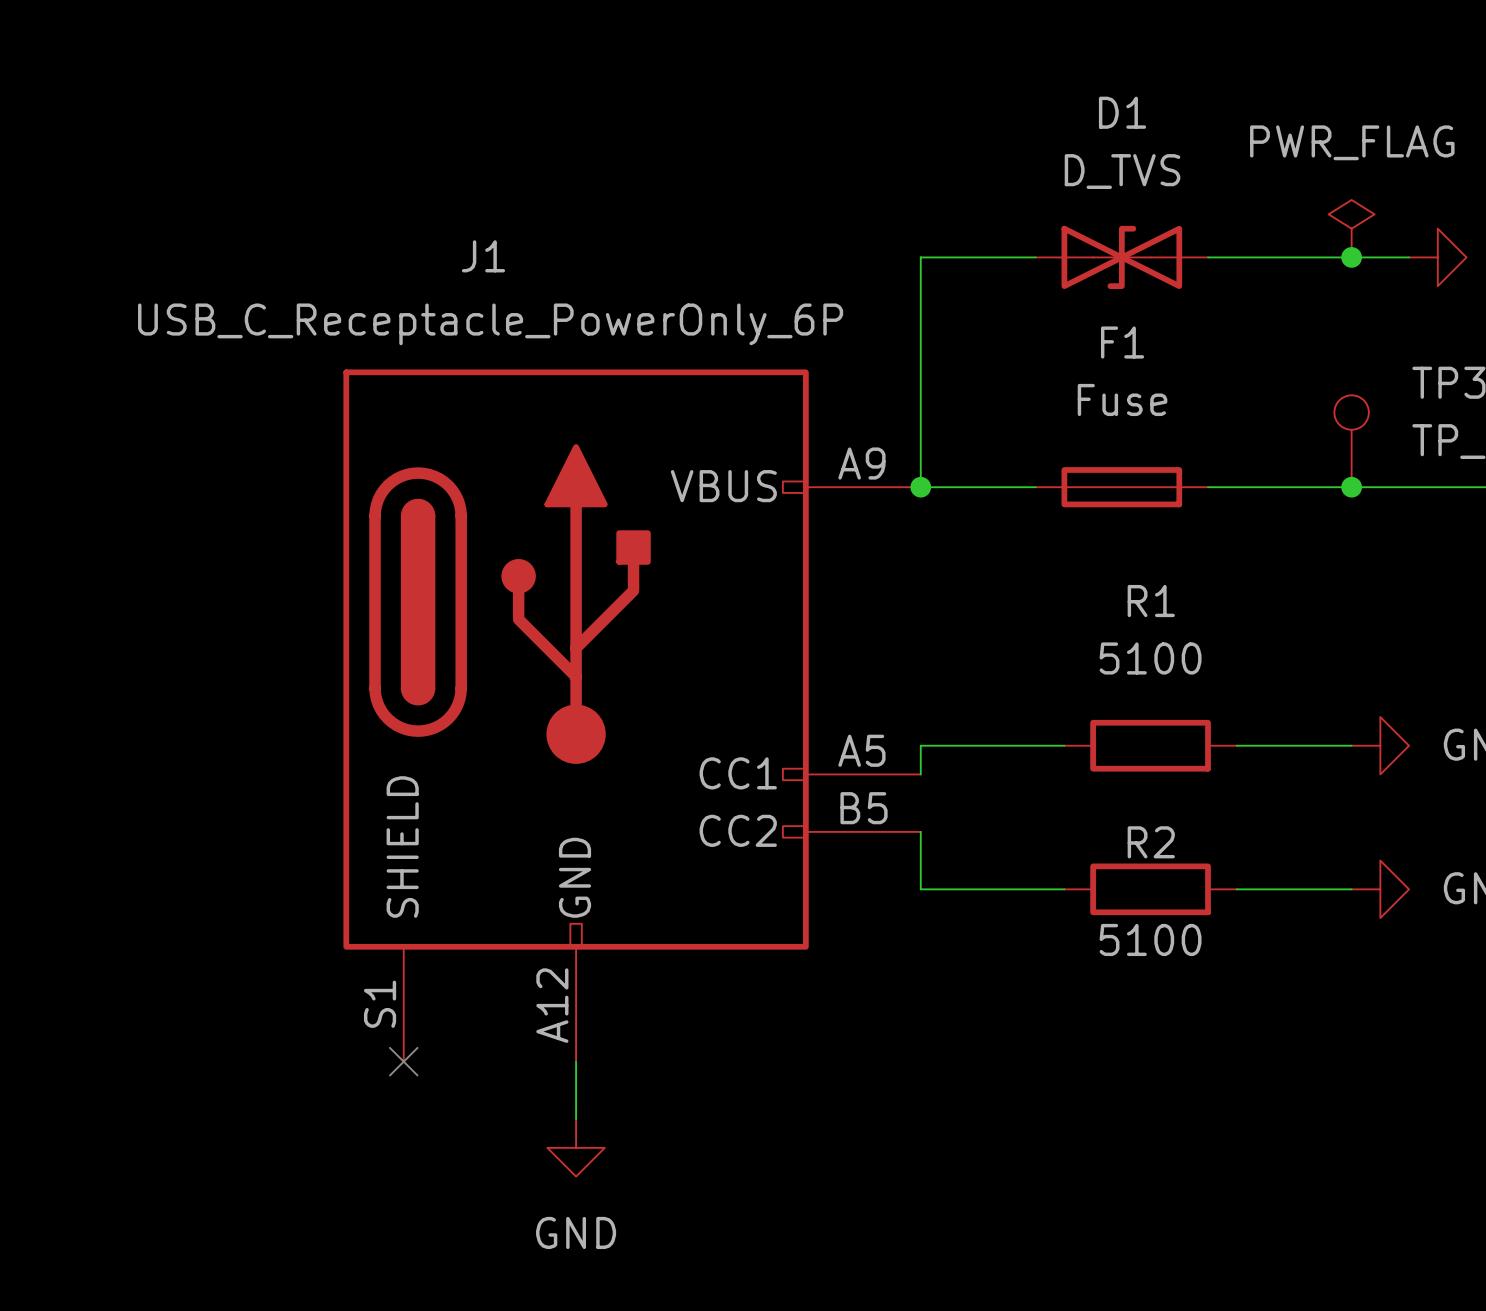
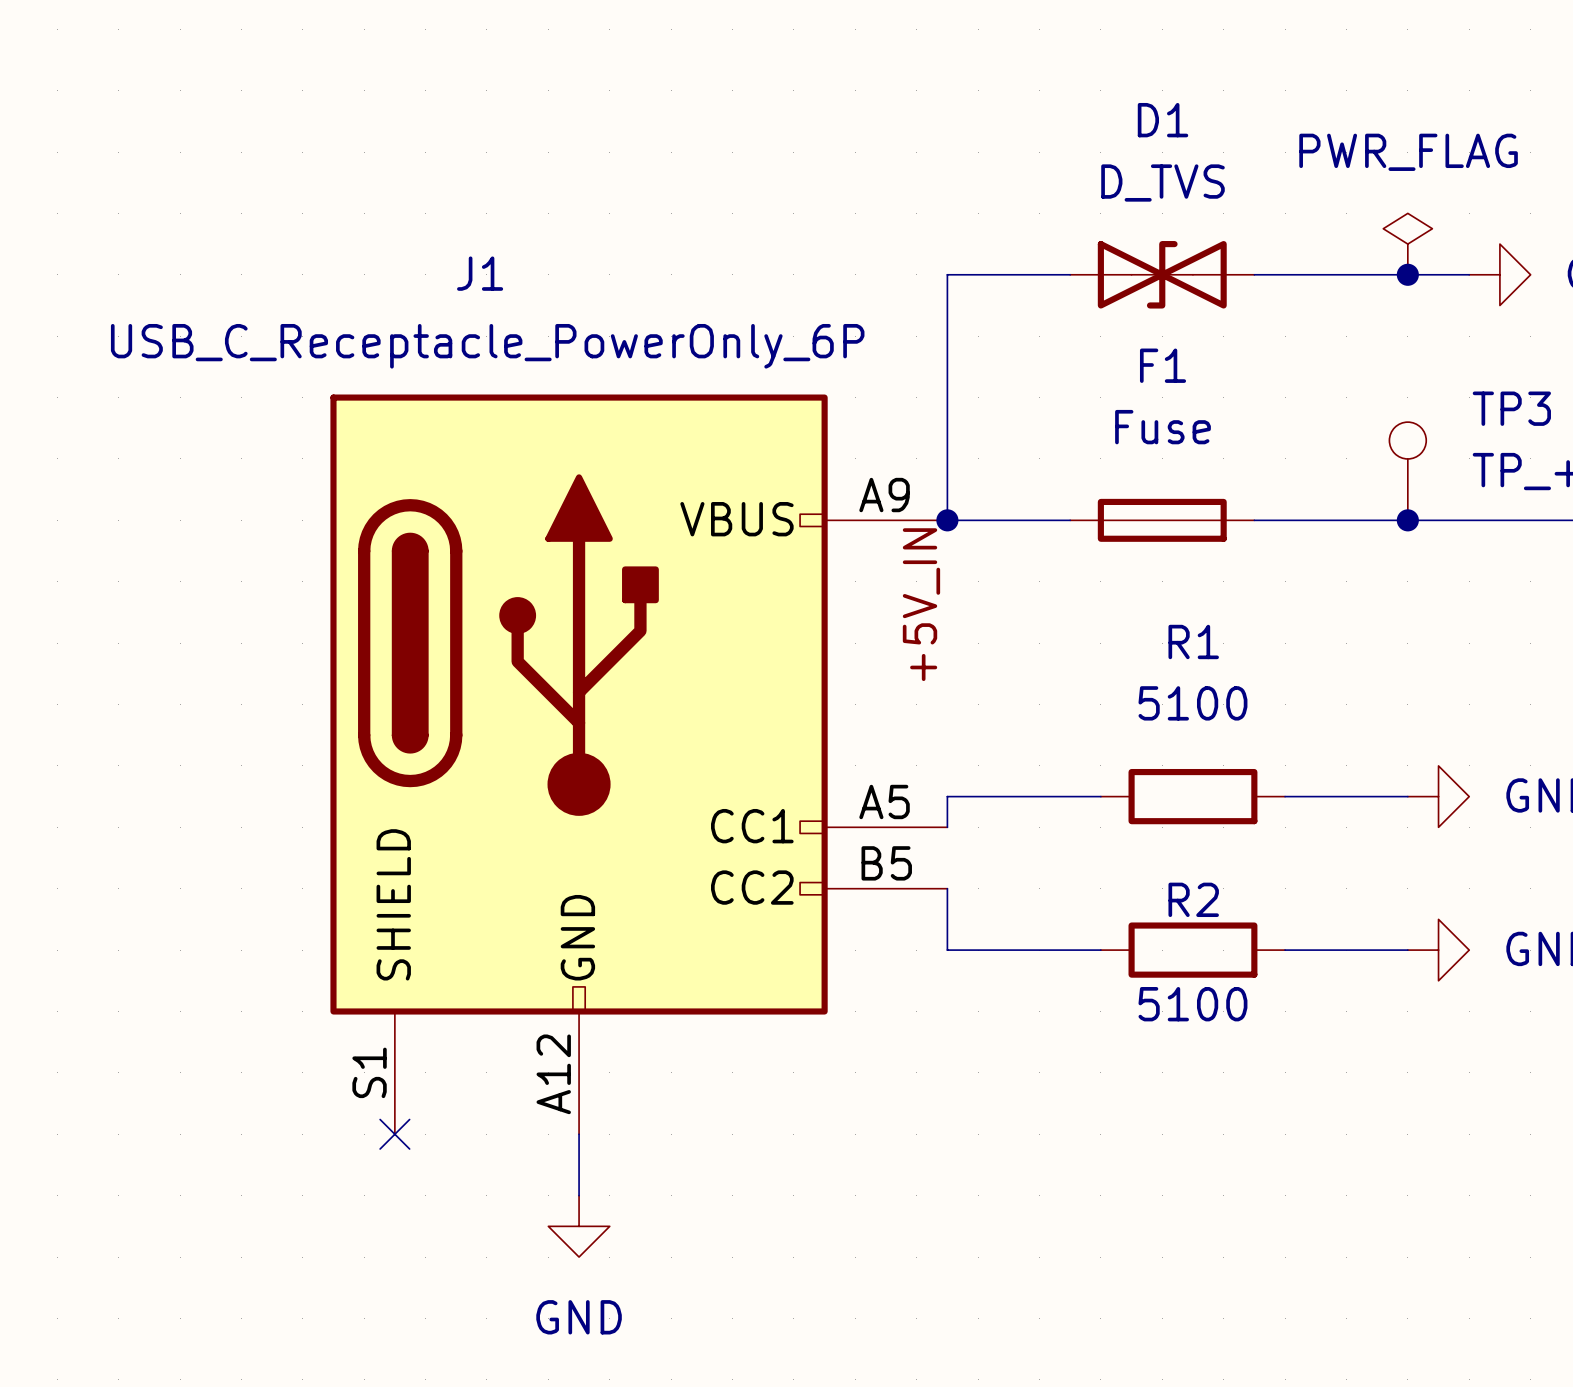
label: none -> +5V_IN (921, 604)

